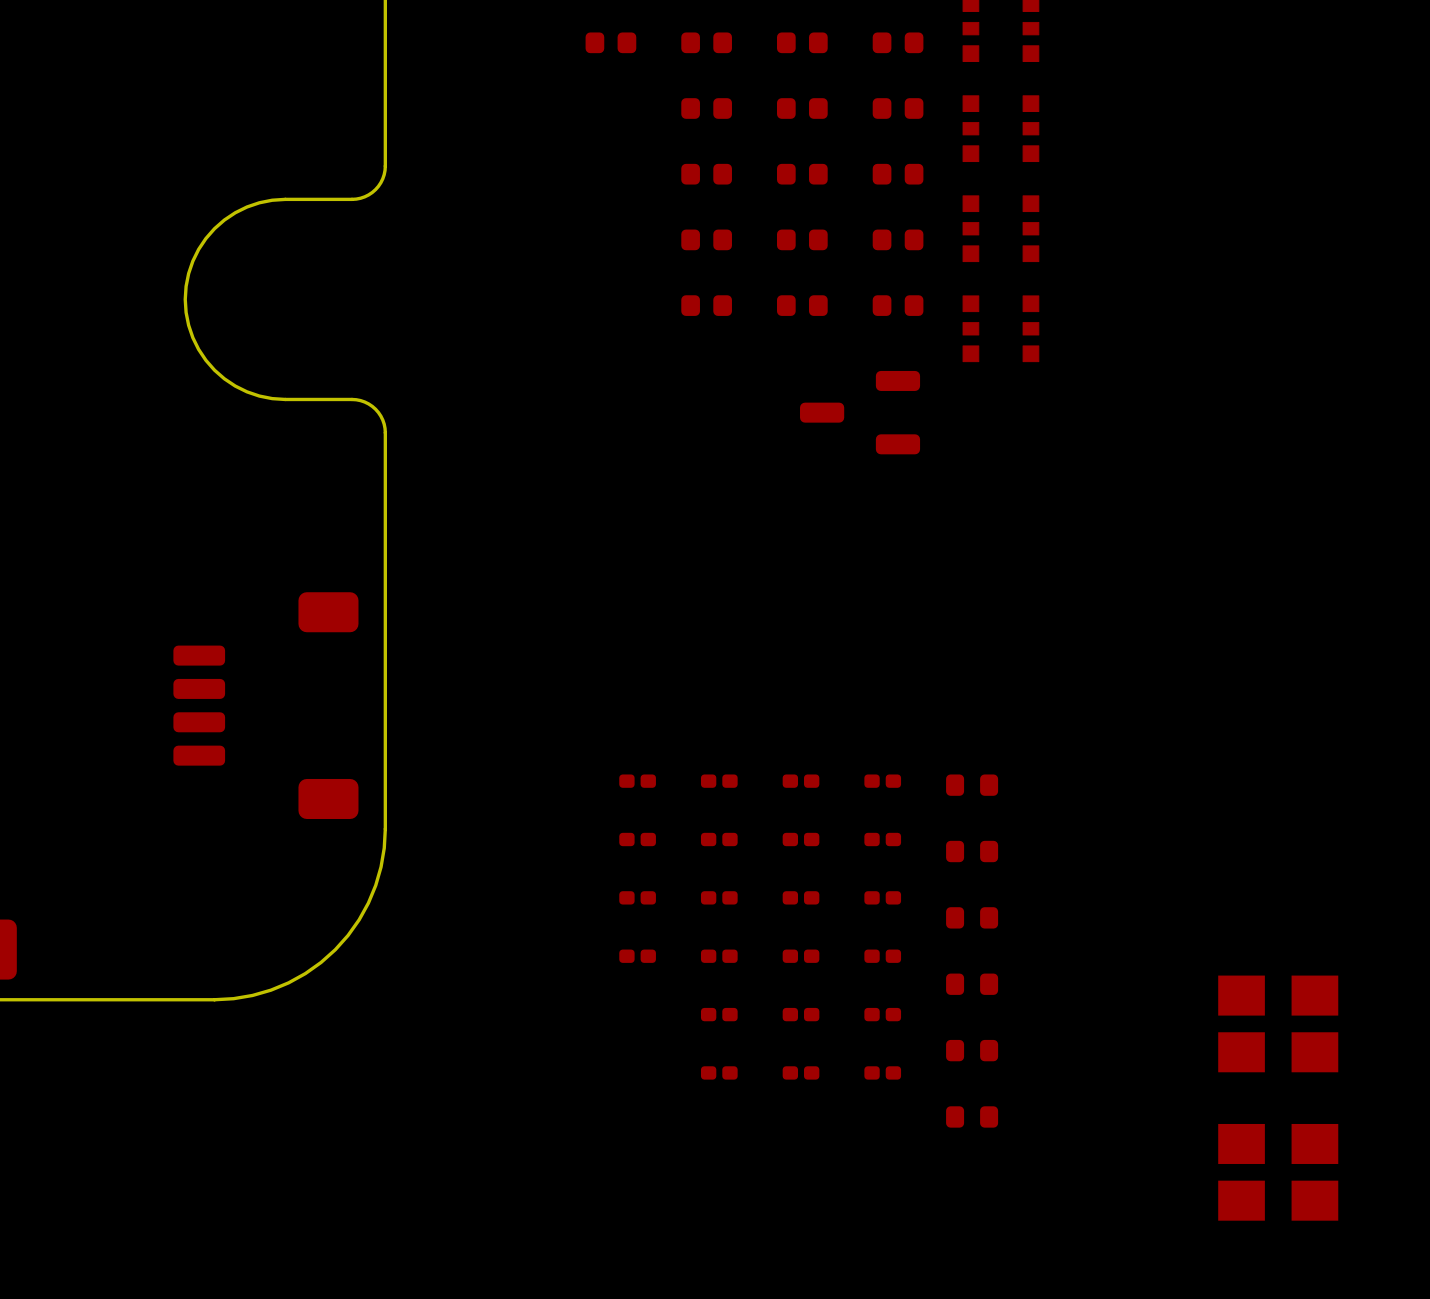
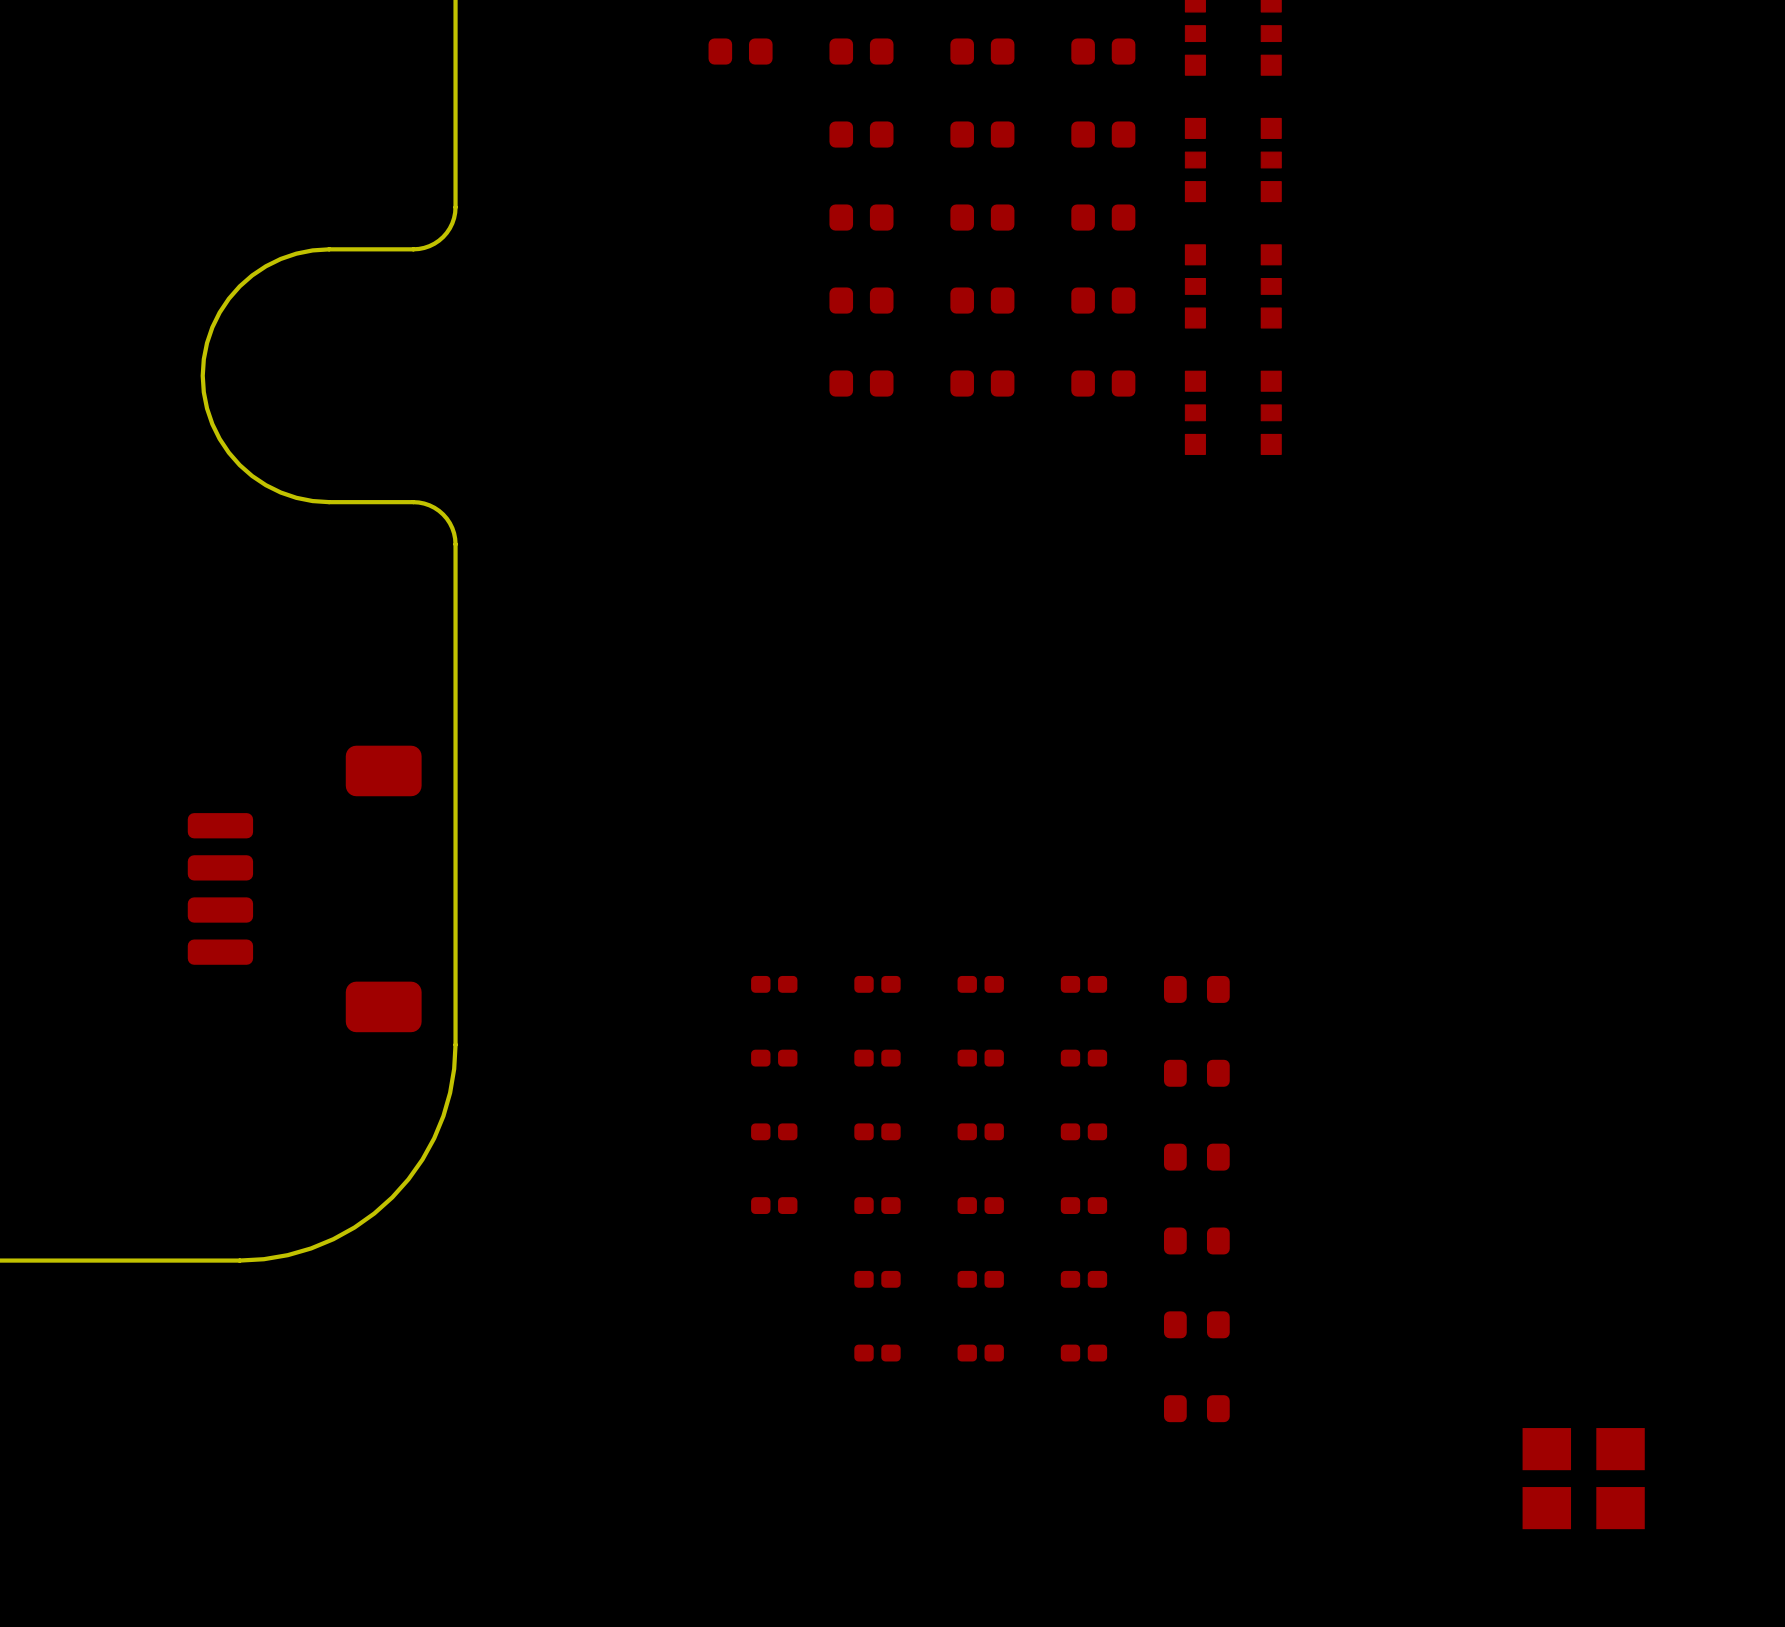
part: (860, 412) -> none
part: (1278, 1023) -> none
part footprint: [1218, 1123, 1339, 1221] -> [1522, 1428, 1645, 1530]

